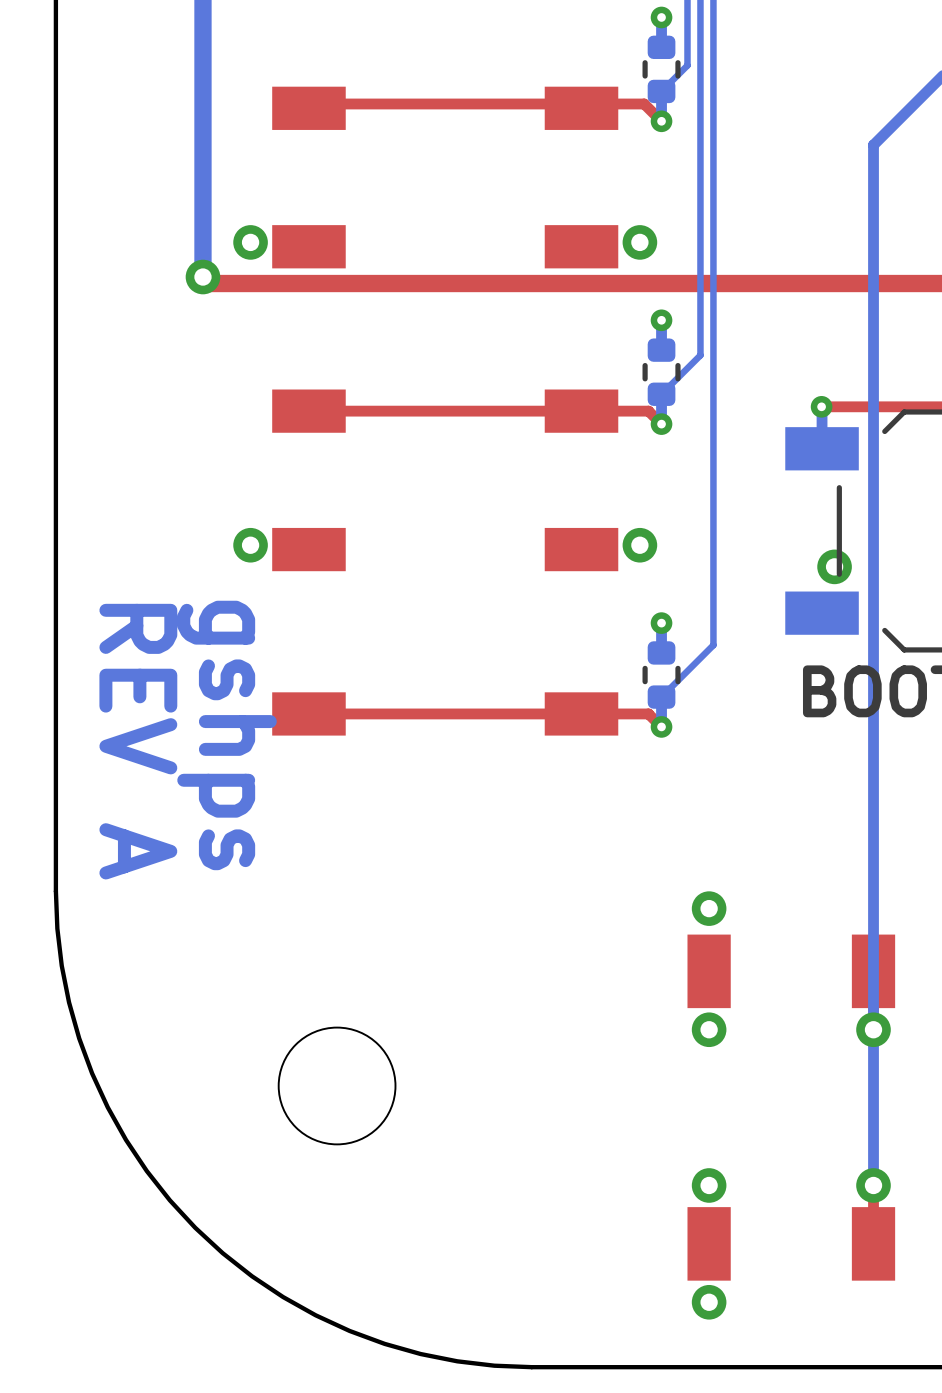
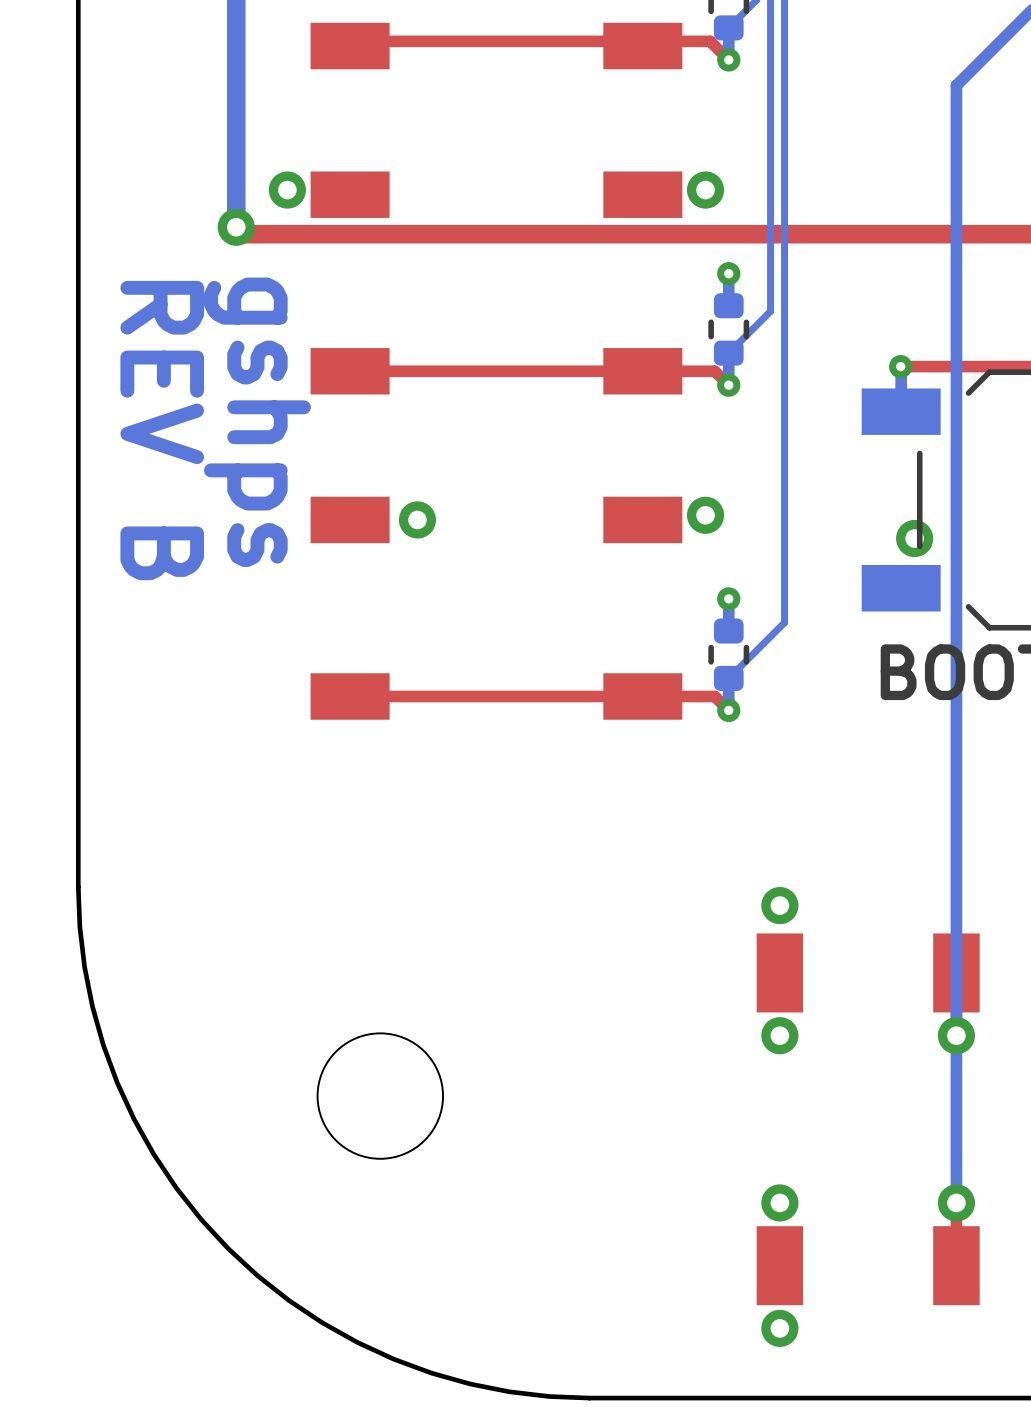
drawing: none -> [120, 277, 311, 581]
via position: (250, 545) -> (417, 519)
drawing: [99, 600, 277, 880] -> none

